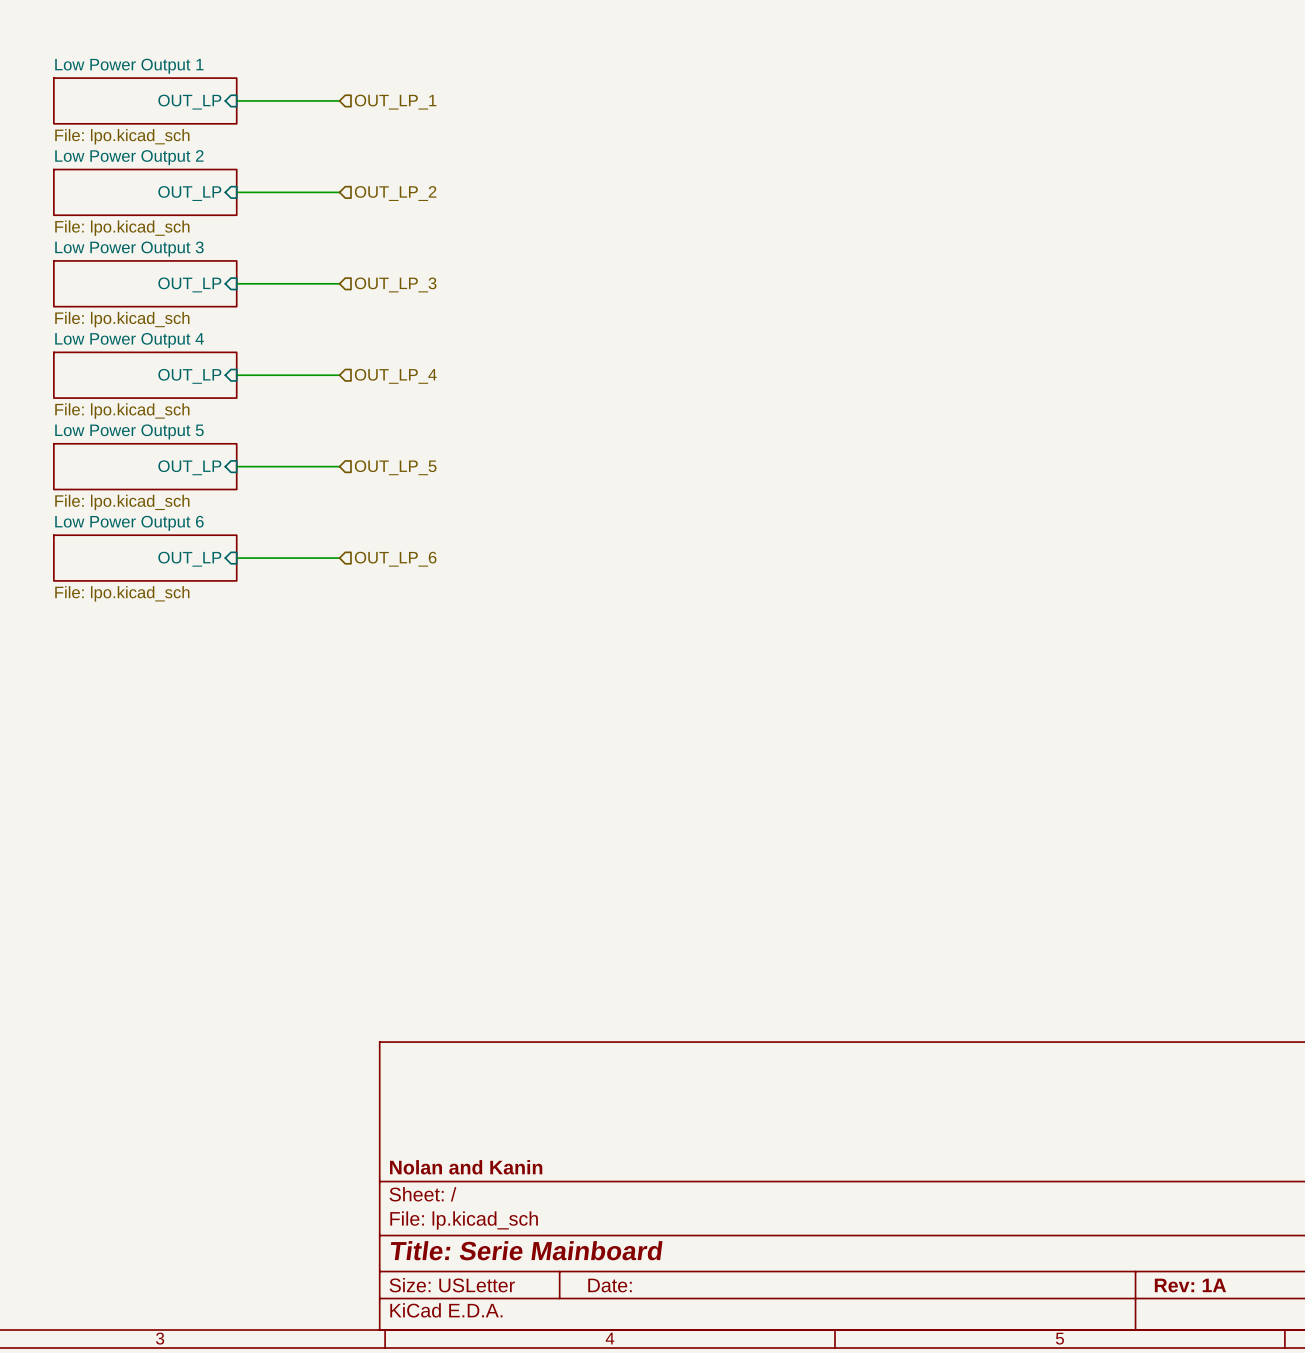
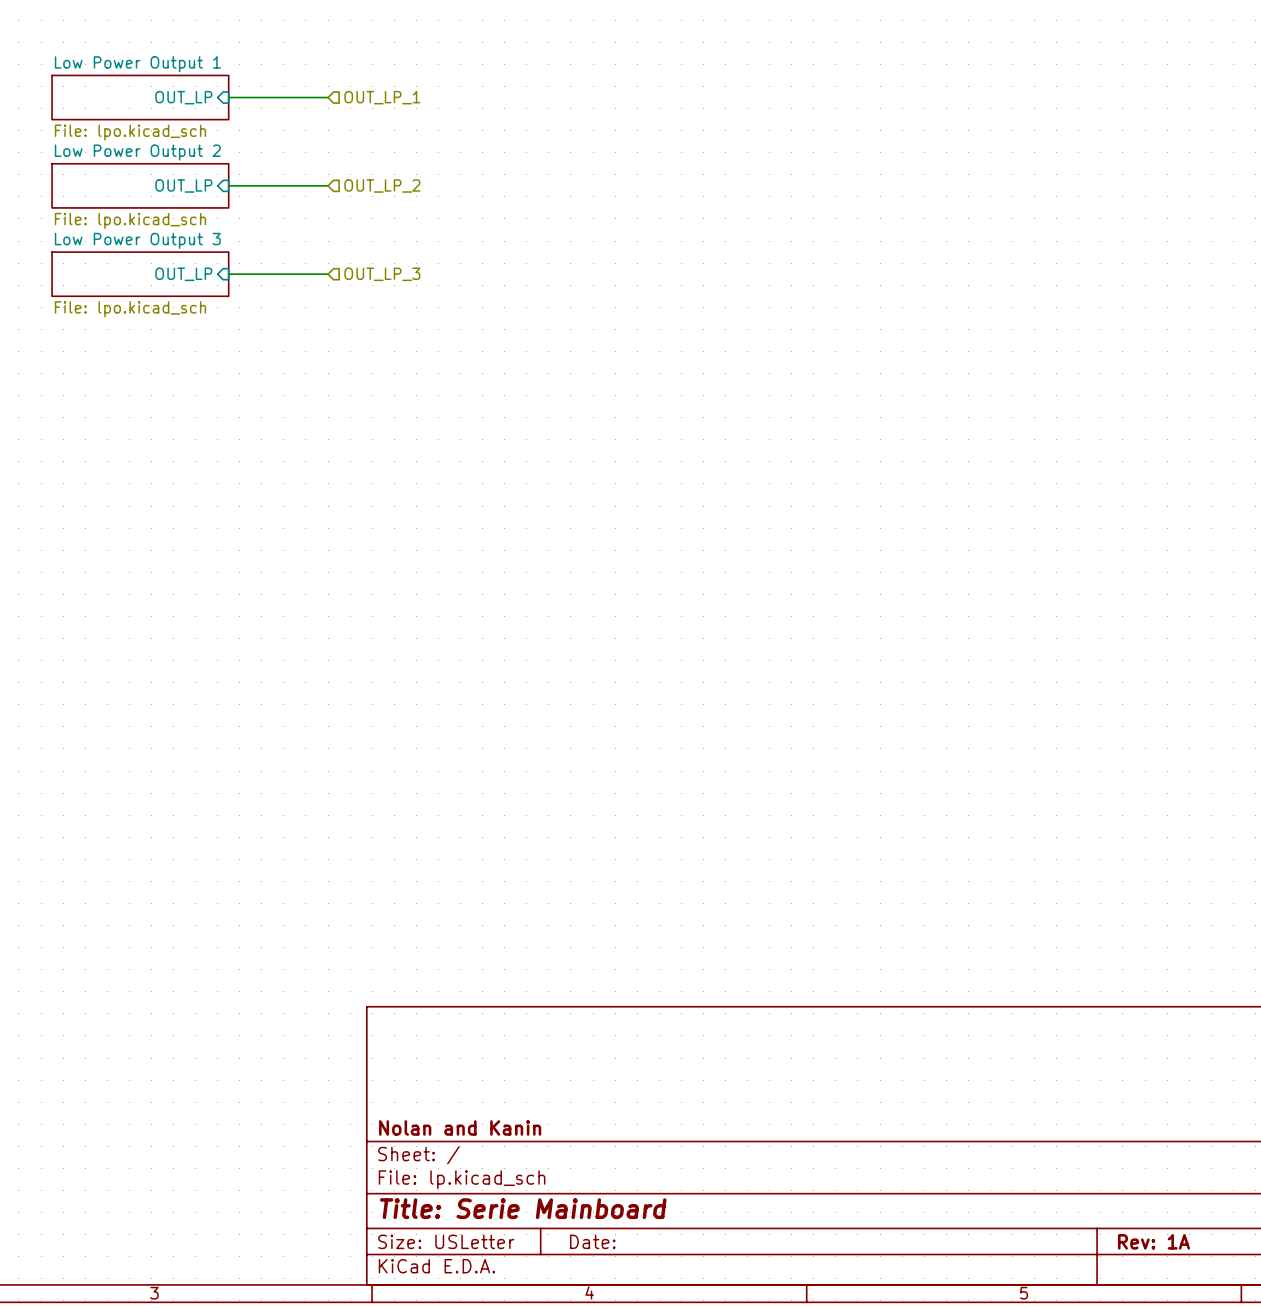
sheet Low Power Output 4: File: lpo.kicad_sch (145, 375) -> none
wire: (236, 375) (339, 375) -> none
sheet pin: OUT_LP (189, 376) -> none
hierarchical label: OUT_LP_4 (395, 376) -> none
sheet Low Power Output 5: File: lpo.kicad_sch (145, 466) -> none
wire: (236, 466) (339, 466) -> none
sheet pin: OUT_LP (189, 467) -> none
hierarchical label: OUT_LP_5 (395, 467) -> none
sheet Low Power Output 6: File: lpo.kicad_sch (145, 558) -> none
wire: (236, 558) (339, 558) -> none
sheet pin: OUT_LP (189, 559) -> none
hierarchical label: OUT_LP_6 (395, 559) -> none

